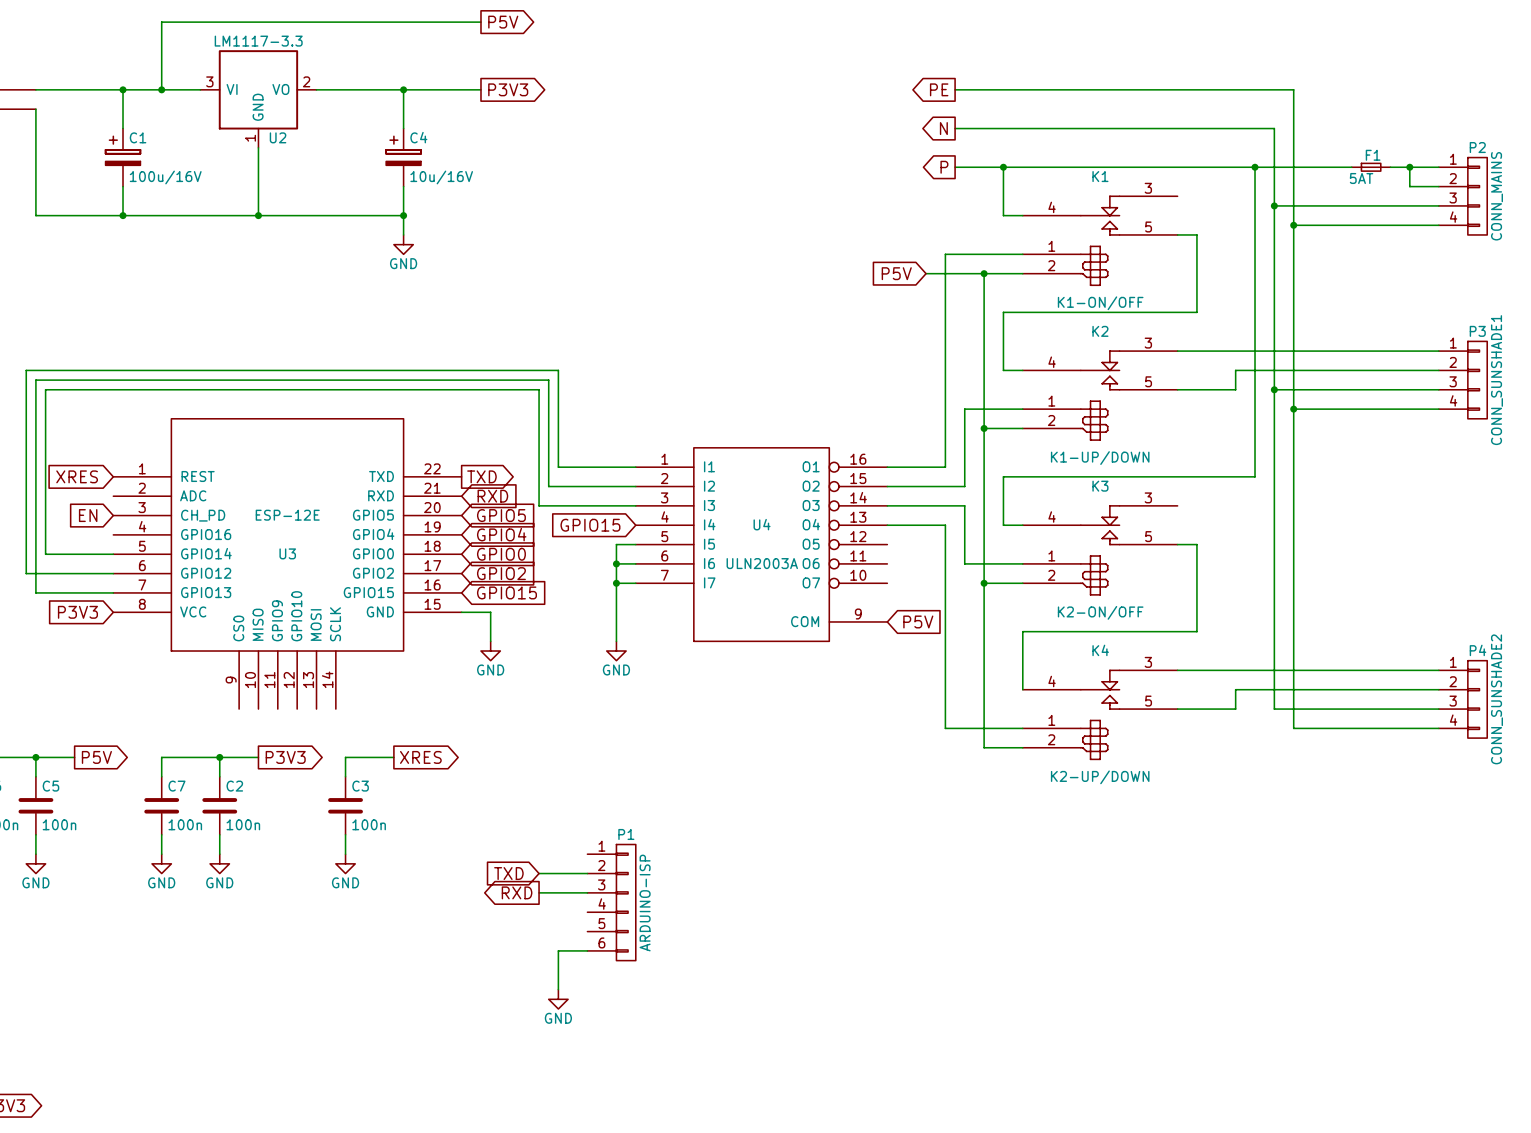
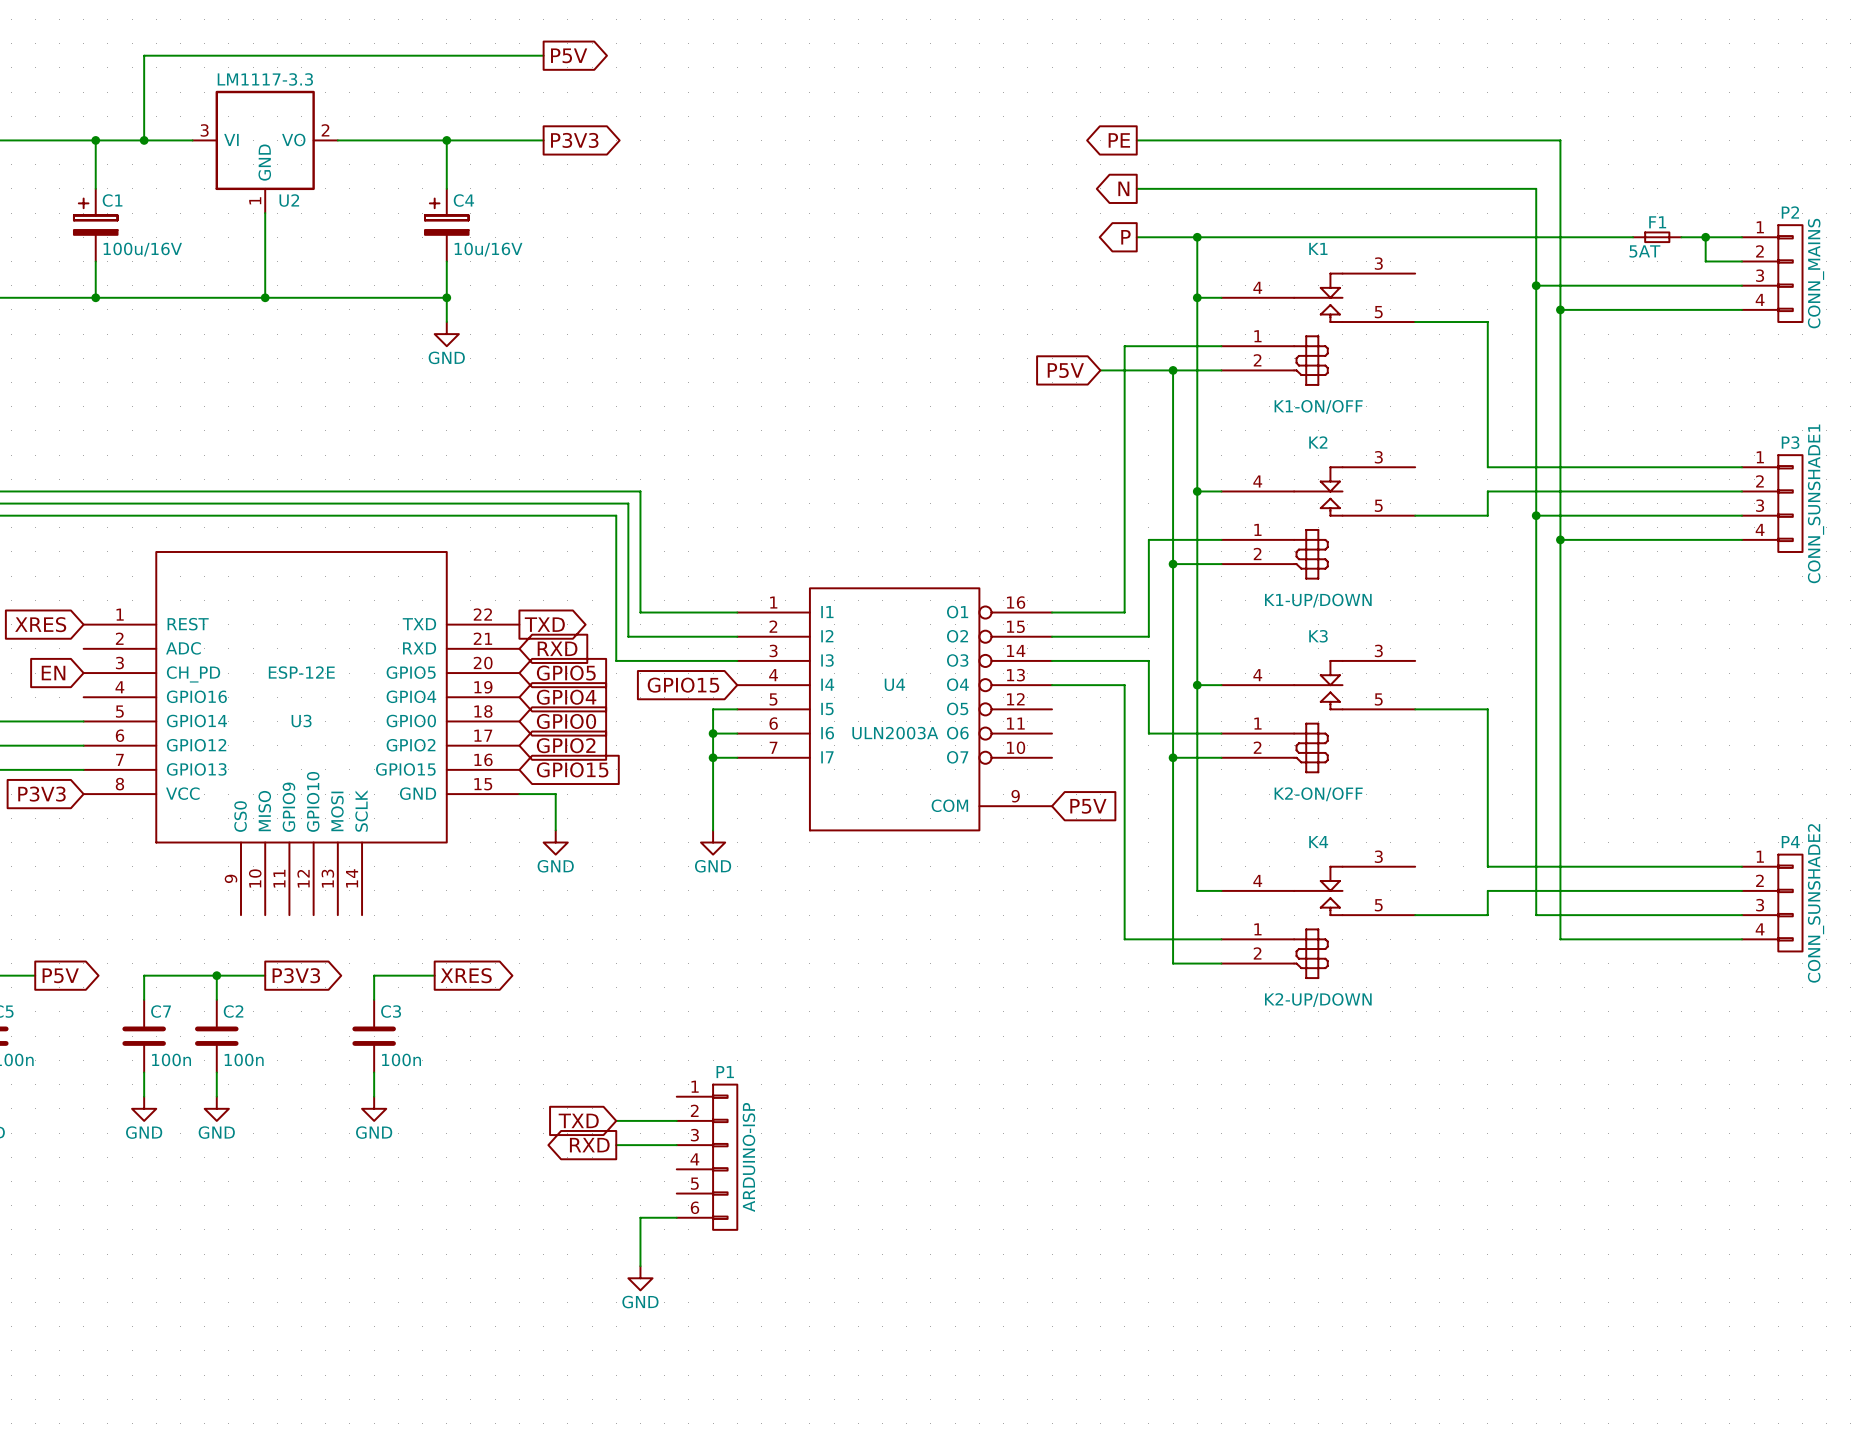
wire: (1255, 167) (1255, 476) (1003, 476) -> (1197, 491) (1197, 624)
junction: (1255, 167) -> none
junction: none -> (1197, 297)
wire: (1196, 234) (1196, 312) (1003, 312) -> (1197, 297) (1197, 418)
wire: (1177, 351) (1235, 351) -> (1439, 322) (1487, 322) (1487, 467)
junction: none -> (1197, 491)
junction: none -> (1197, 685)
wire: (1196, 544) (1196, 631) (1022, 631) (1022, 689) -> (1197, 685) (1197, 890) (1221, 890)
wire: (1177, 670) (1235, 670) -> (1439, 709) (1487, 709) (1487, 866)

